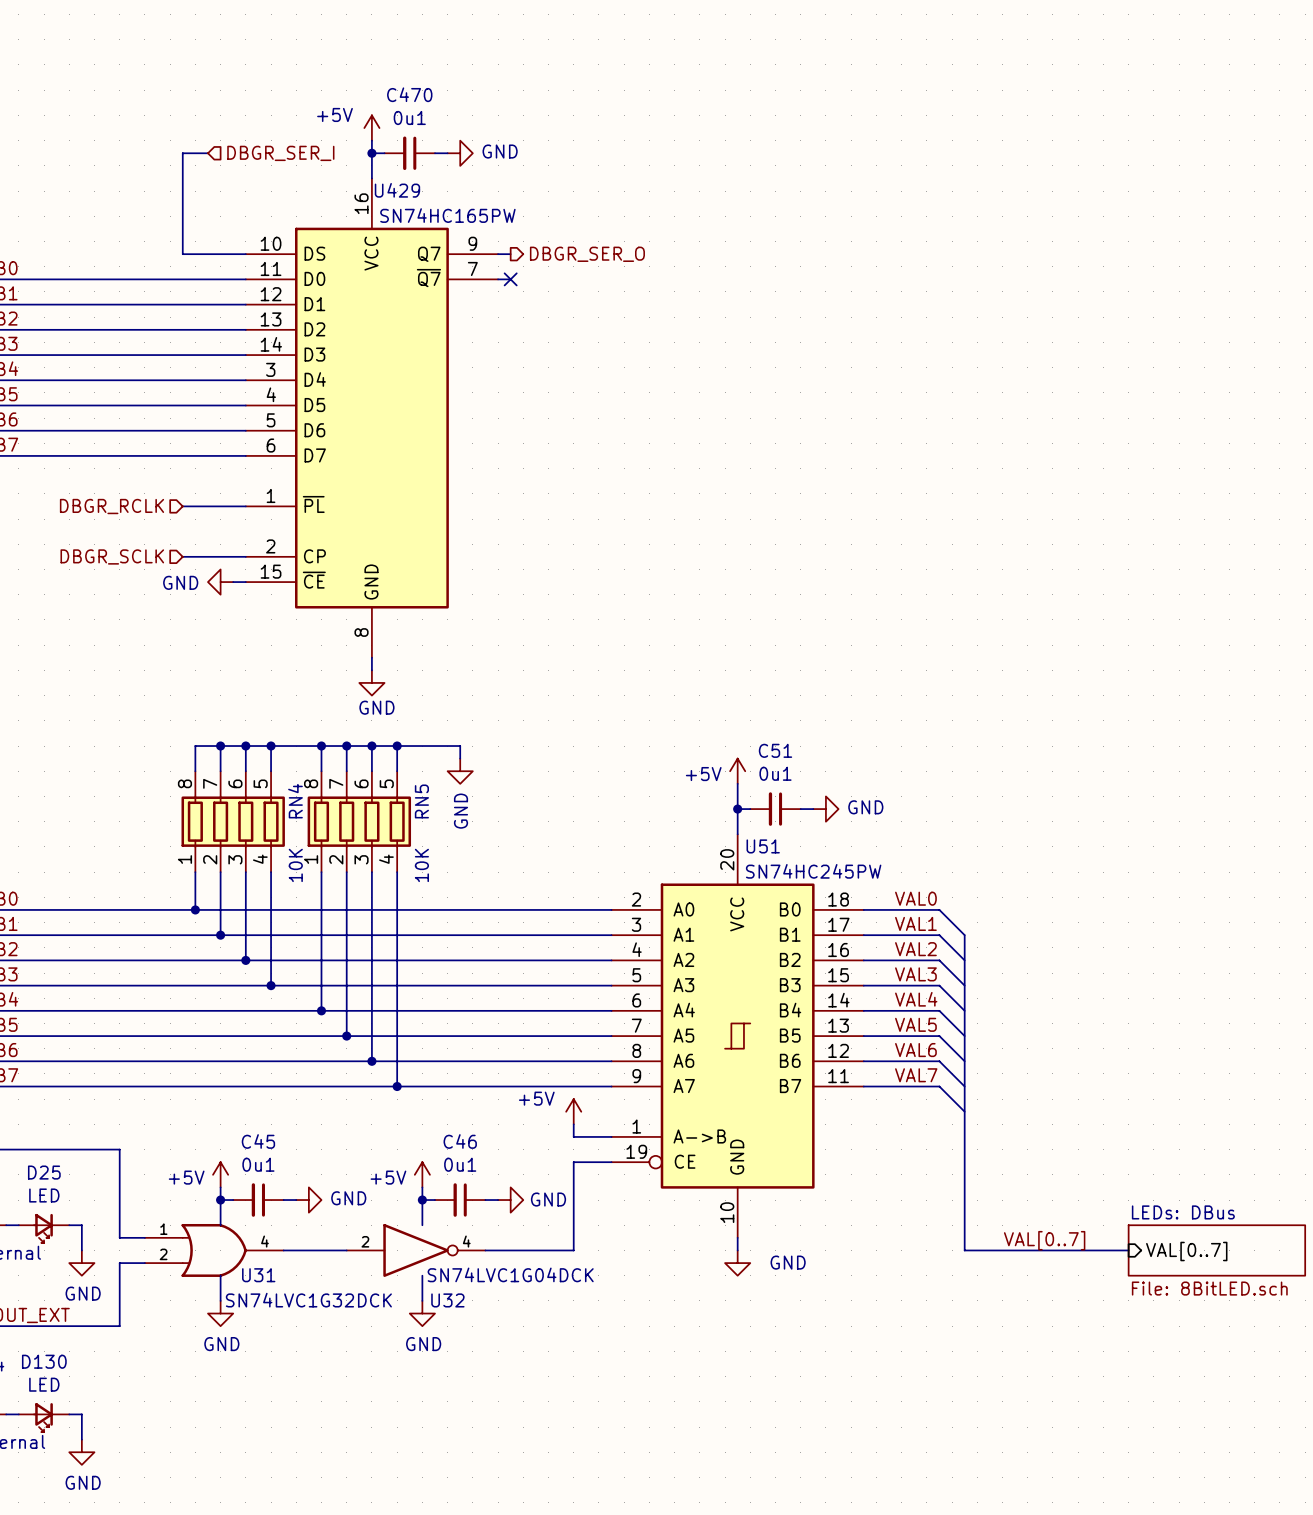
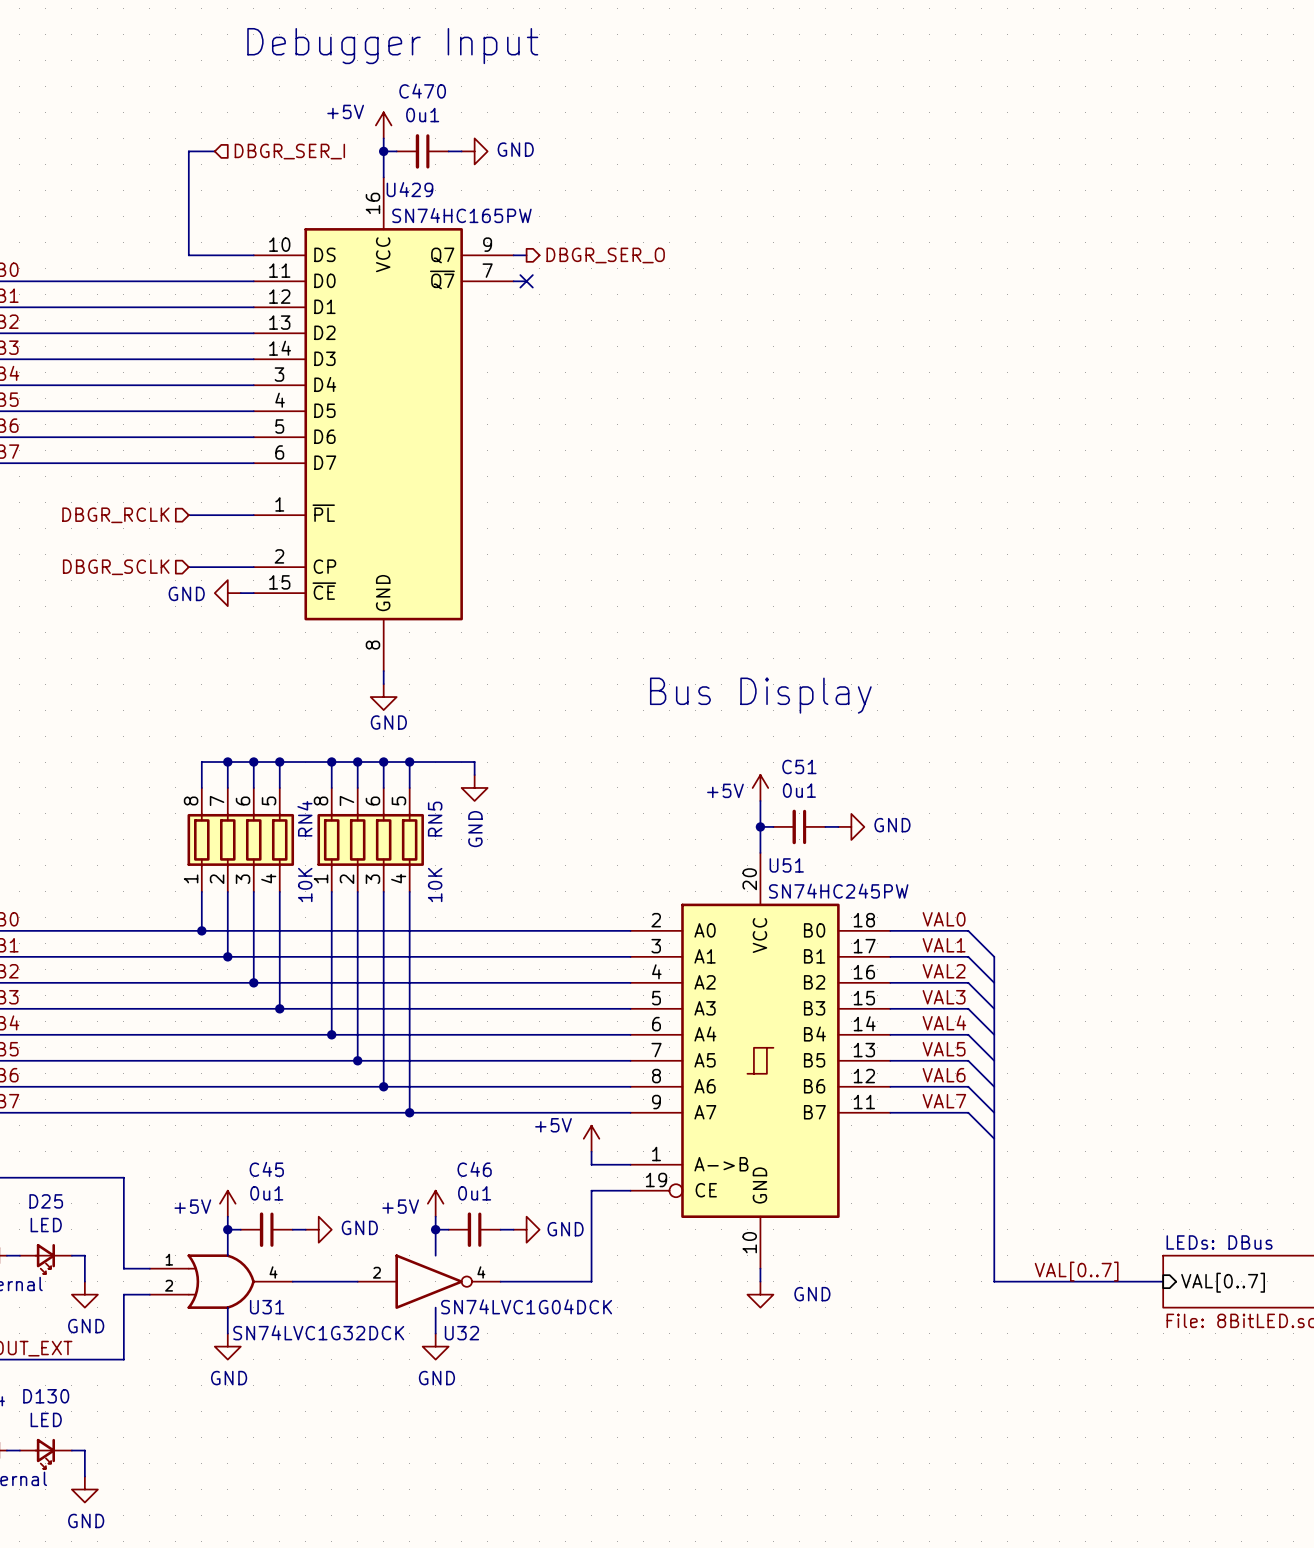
text: none -> Debugger Input (392, 46)
text: none -> Bus Display (760, 695)

